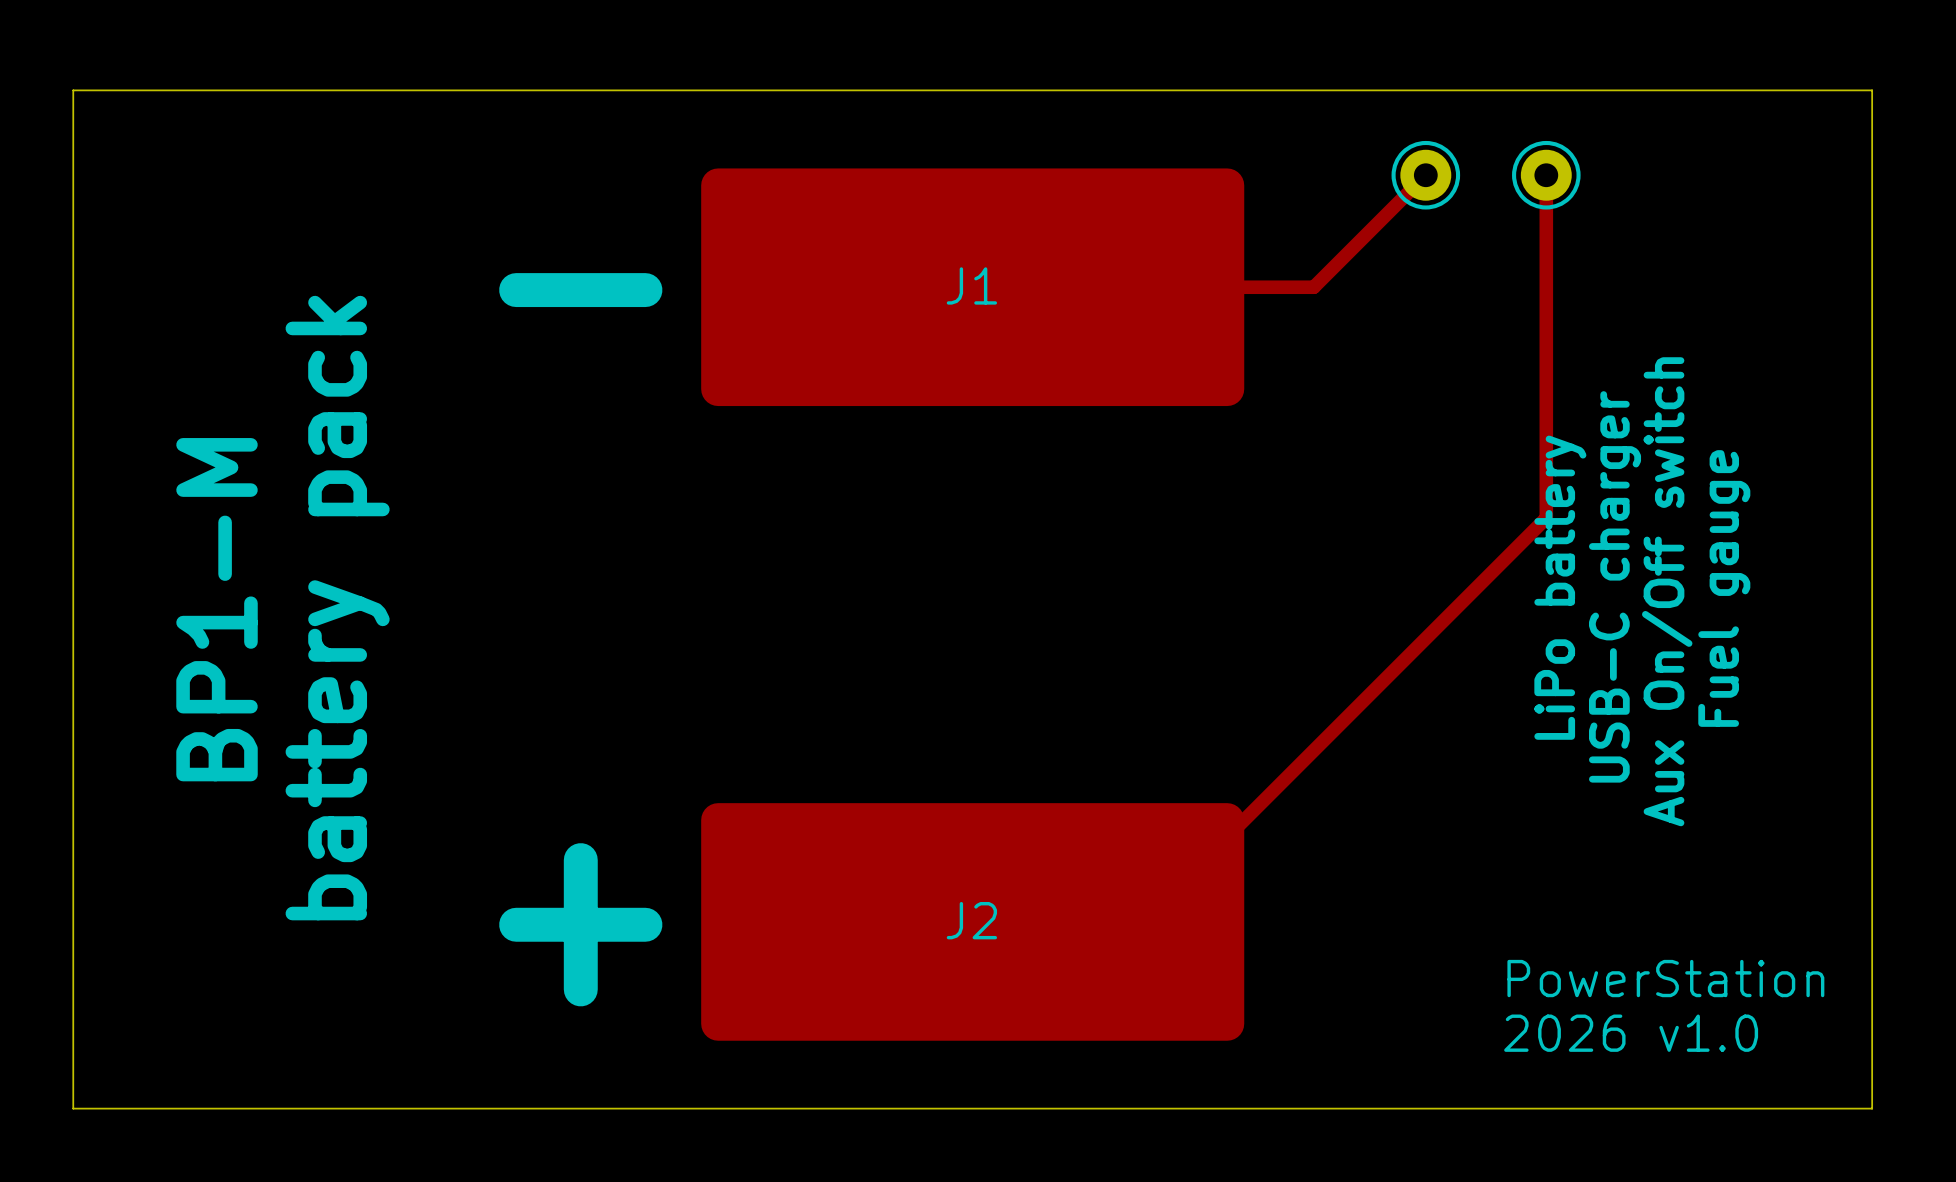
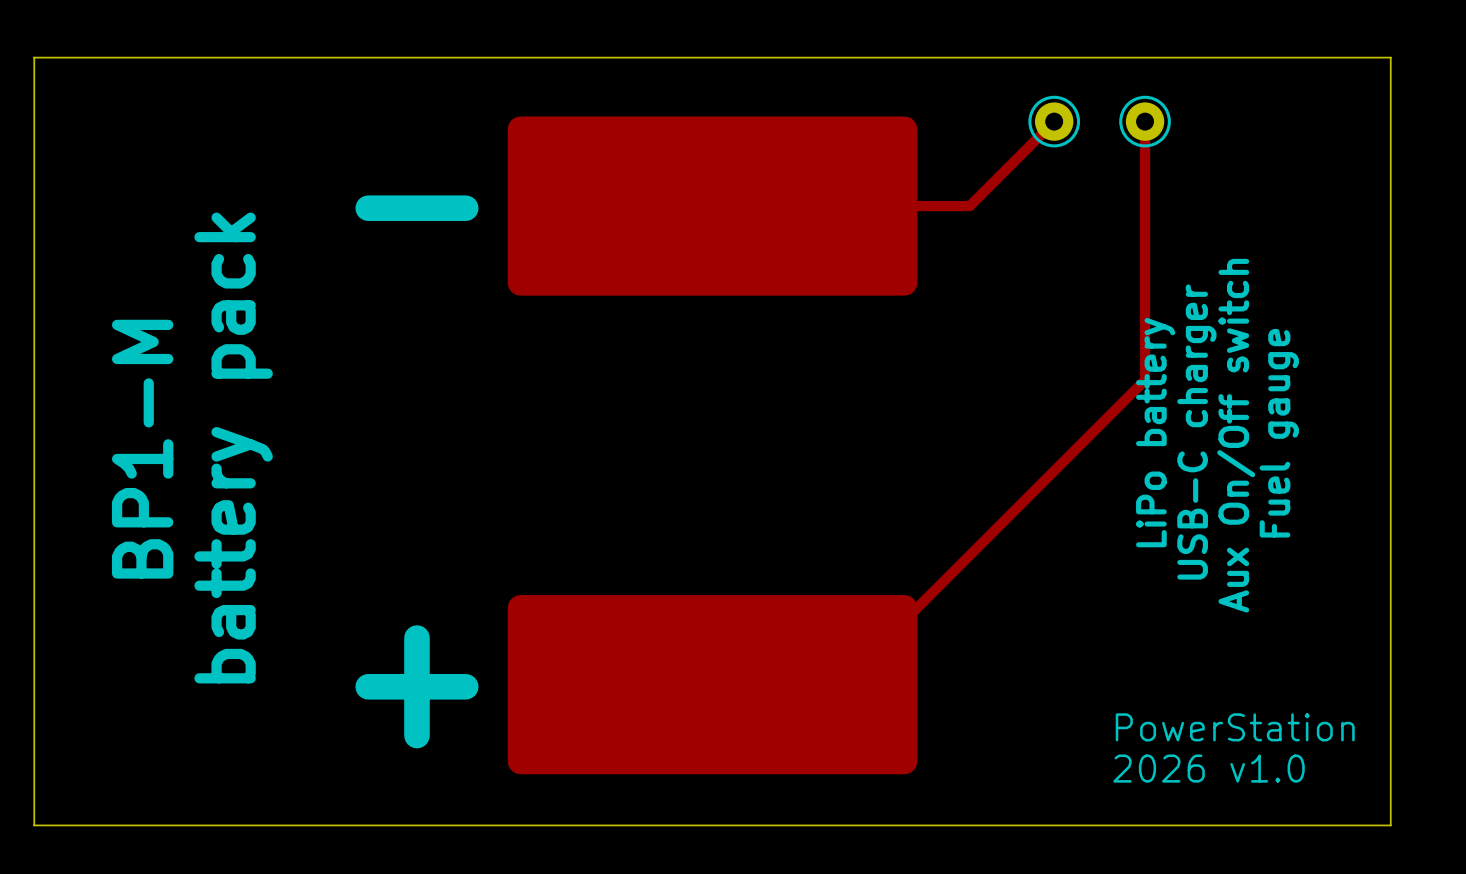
J1 name: J1 (971, 285) -> none
J2 name: J2 (971, 920) -> none

